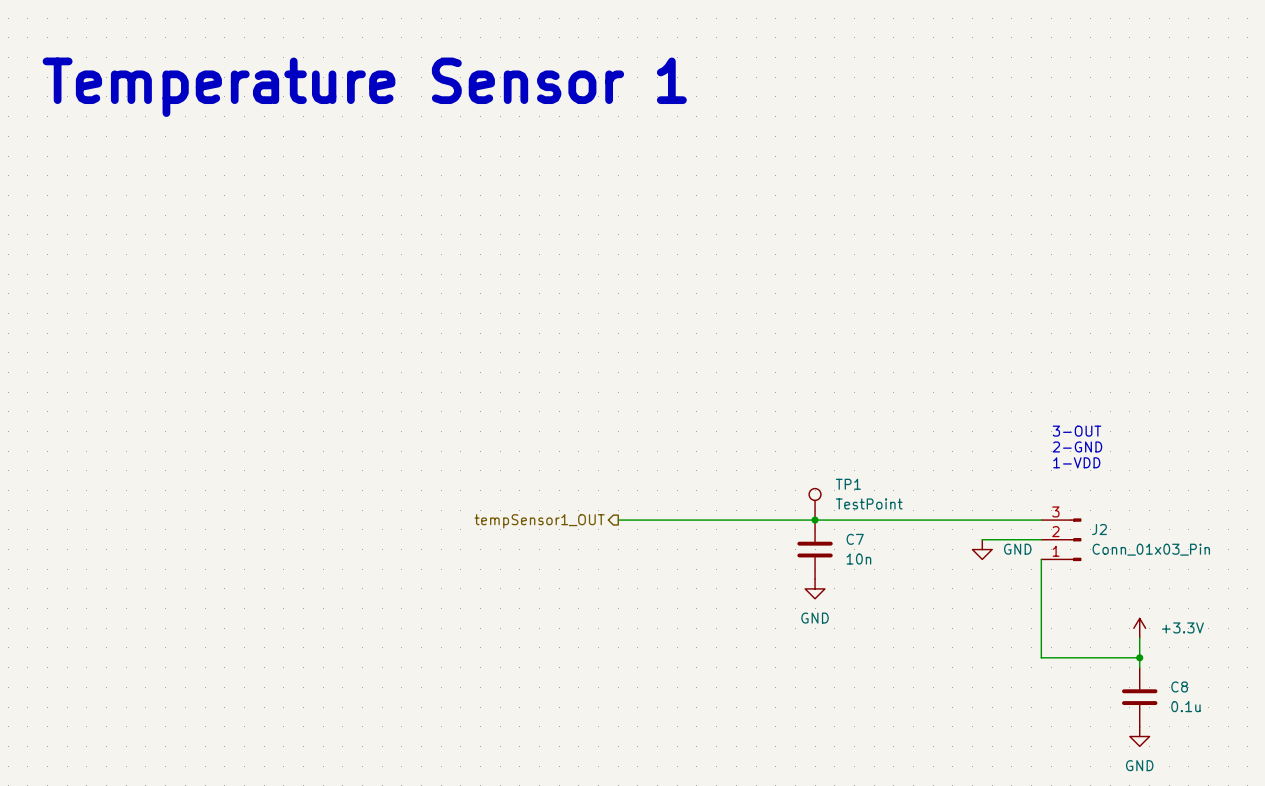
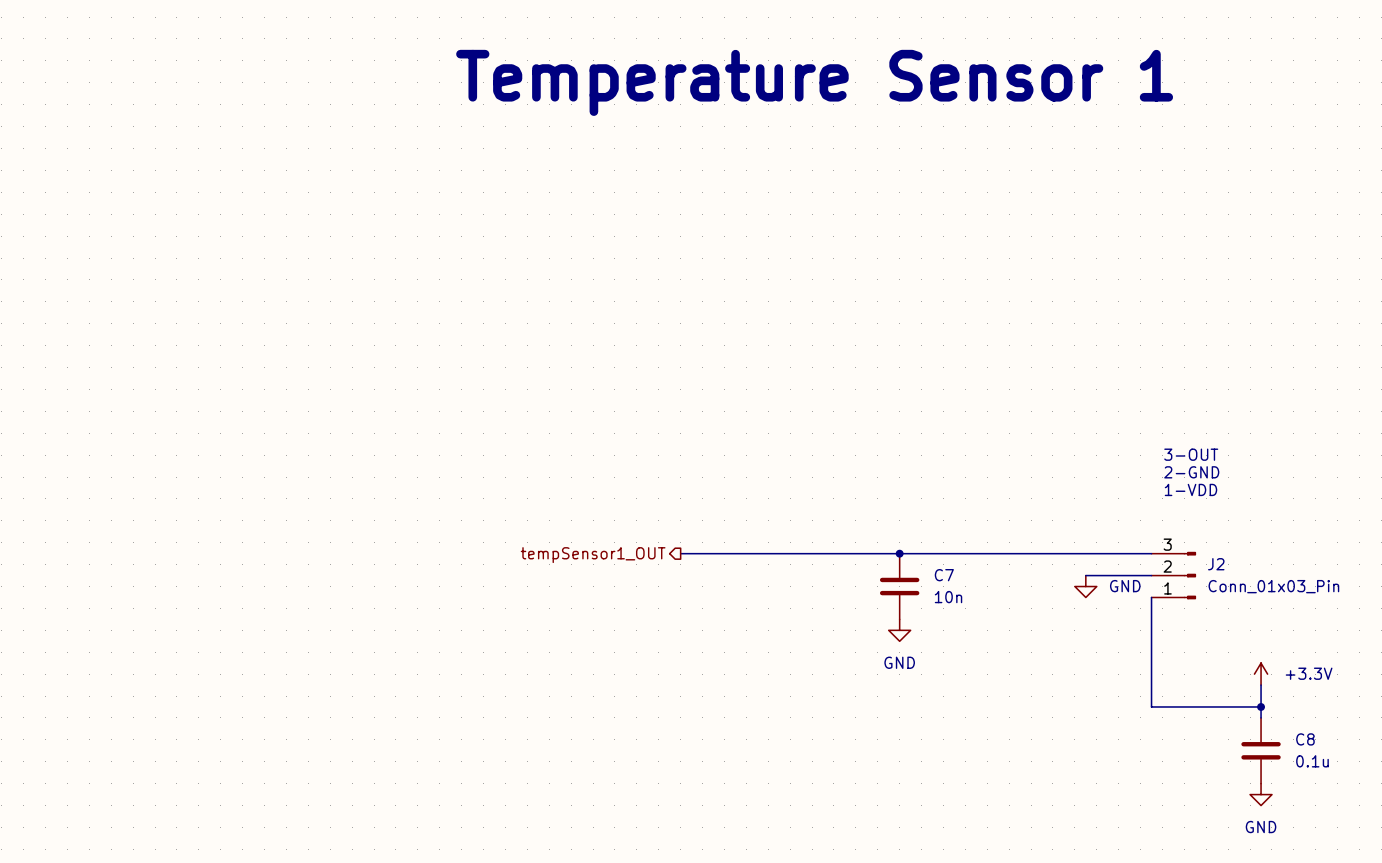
text: Temperature Sensor 1 (364, 87) -> none
text: none -> Temperature Sensor 1 (814, 82)
TP1: TestPoint (815, 504) -> none

